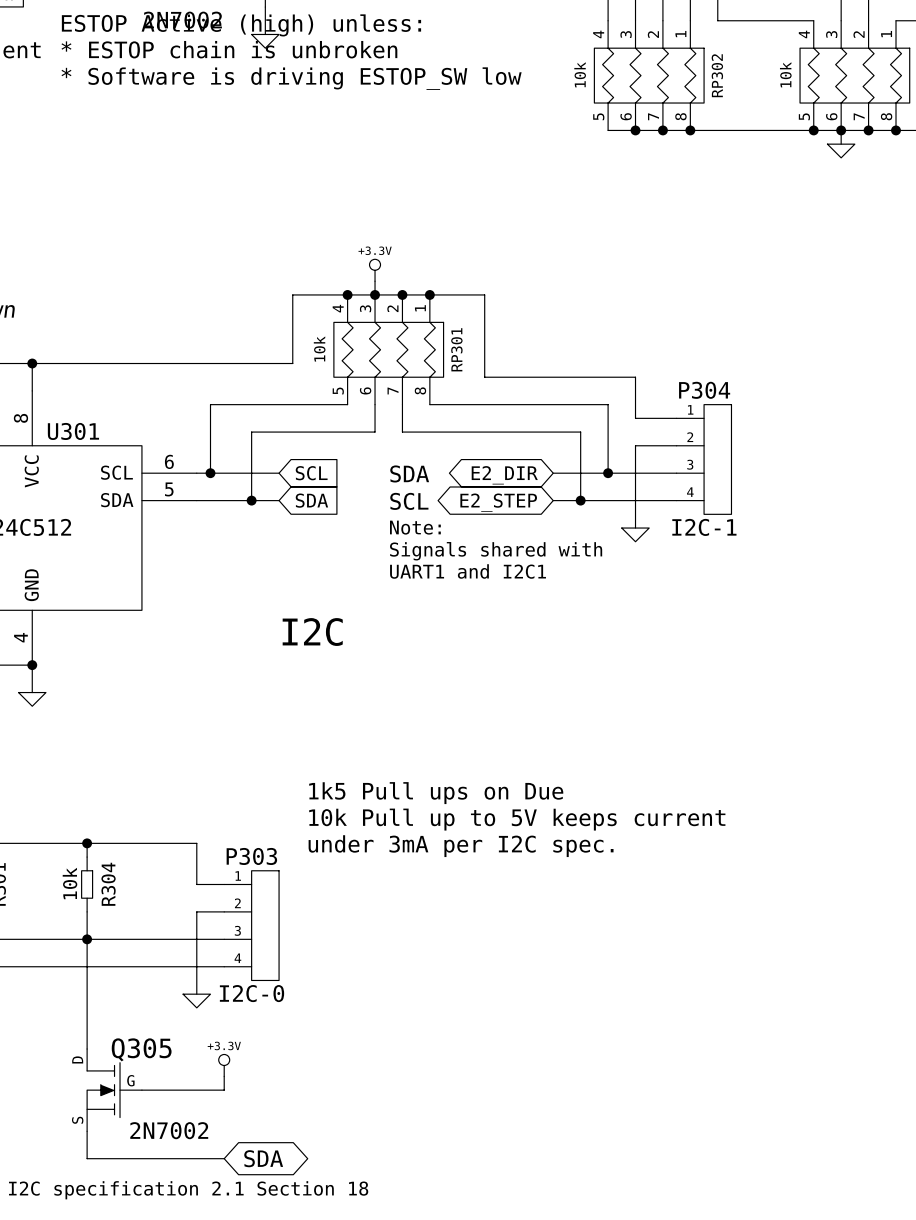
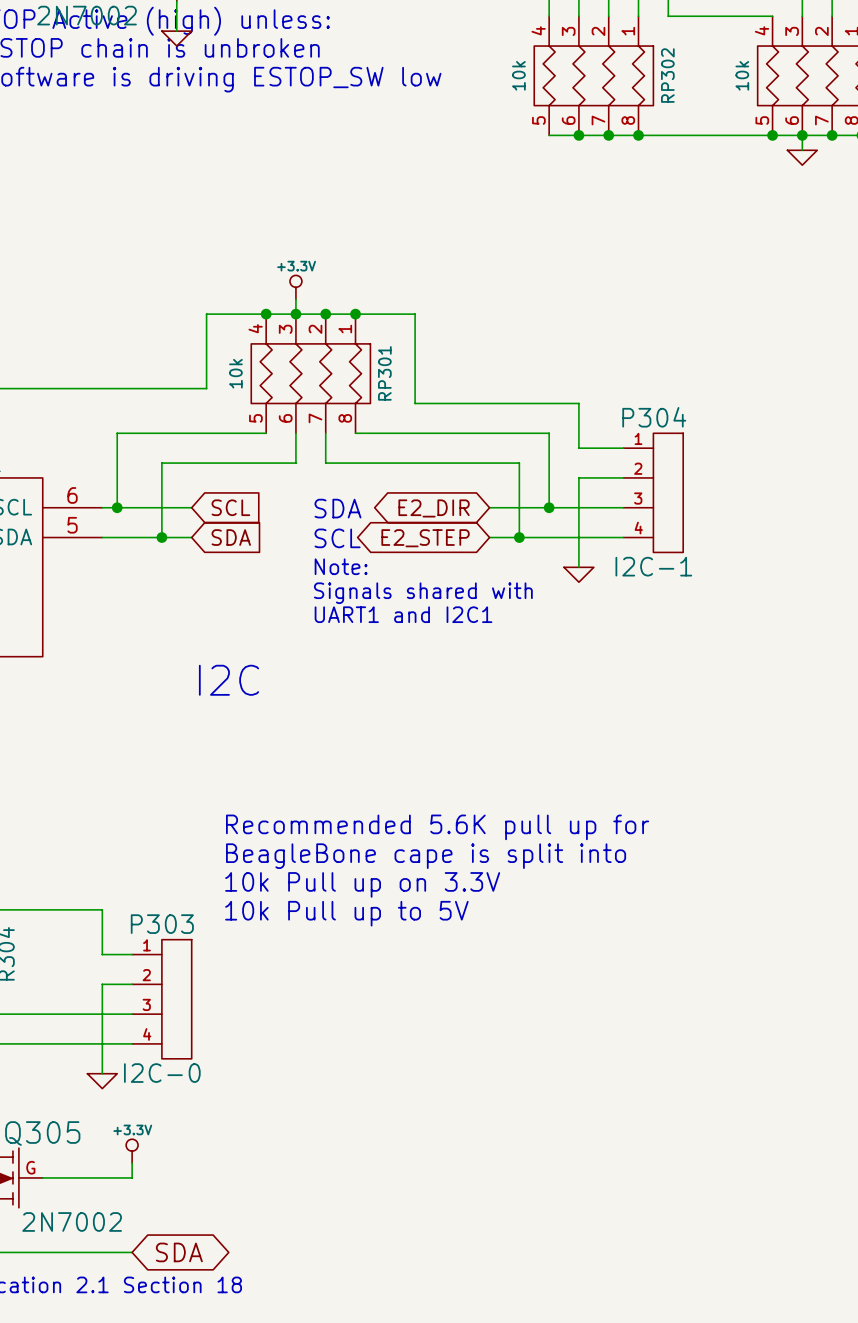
text: none -> Recommended 5.6K pull up for (437, 827)
text: 1k5 Pull ups on Due (436, 793) -> BeagleBone cape is split into (426, 856)
text: 10k Pull up to 5V keeps current (517, 819) -> 10k Pull up on 3.3V (362, 884)
text: under 3mA per I2C spec. (461, 846) -> 10k Pull up to 5V (346, 913)

